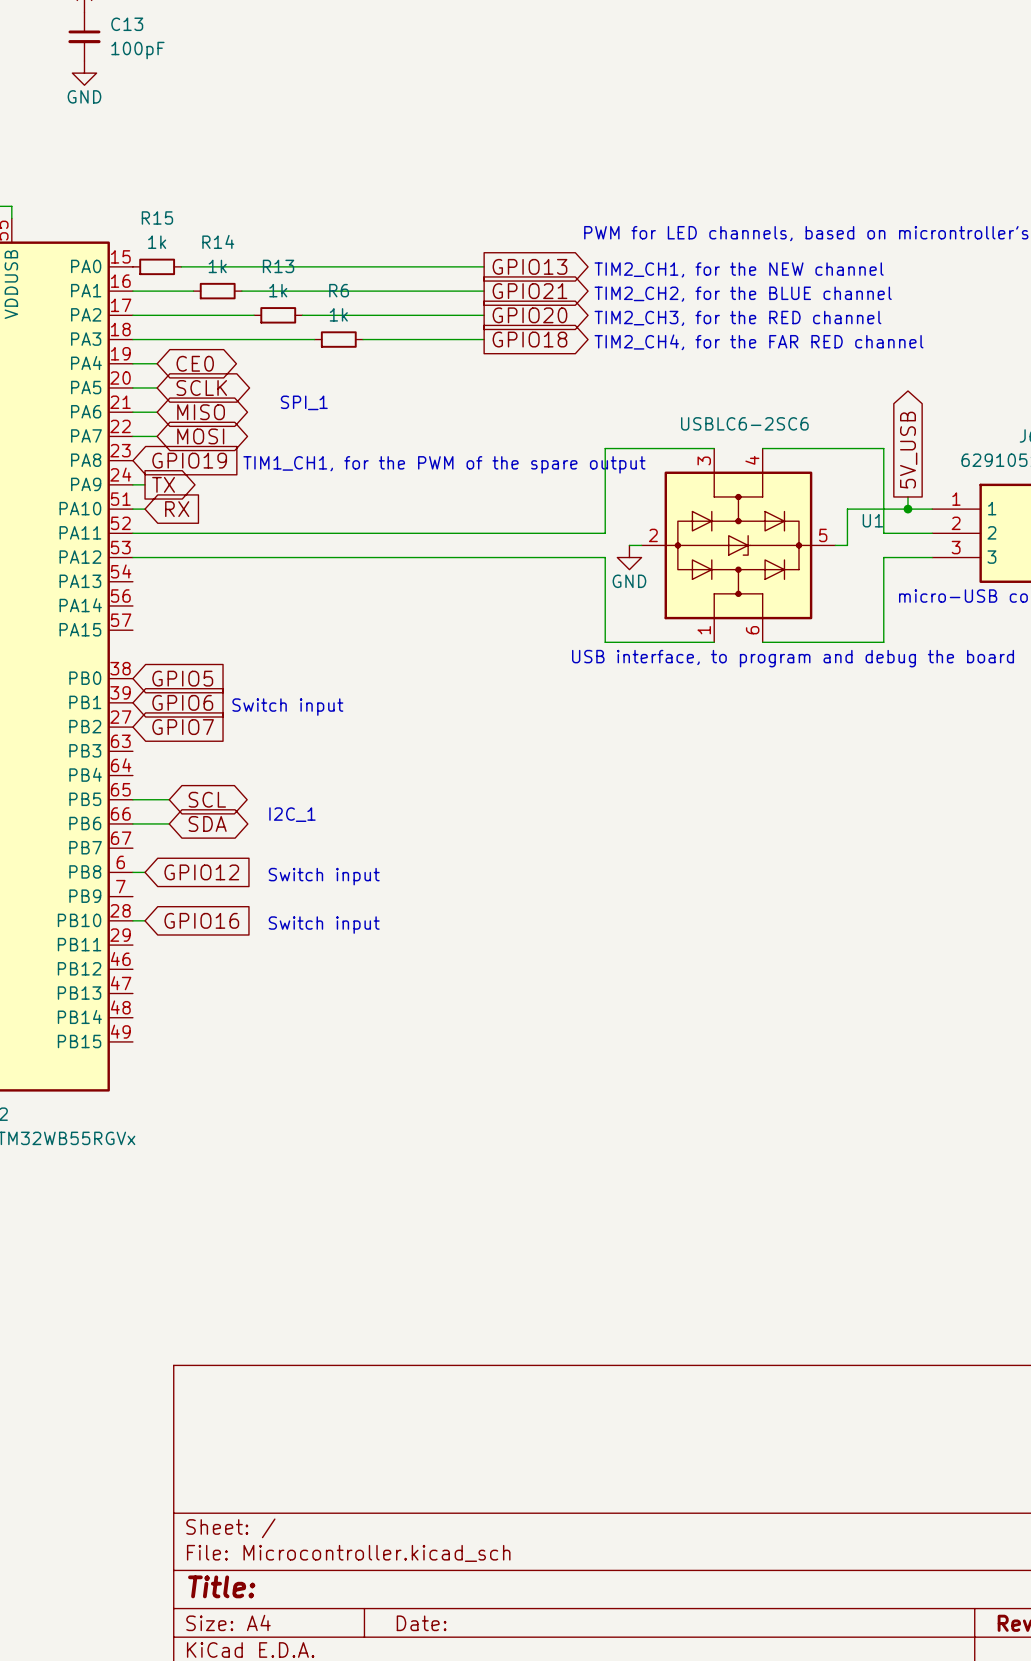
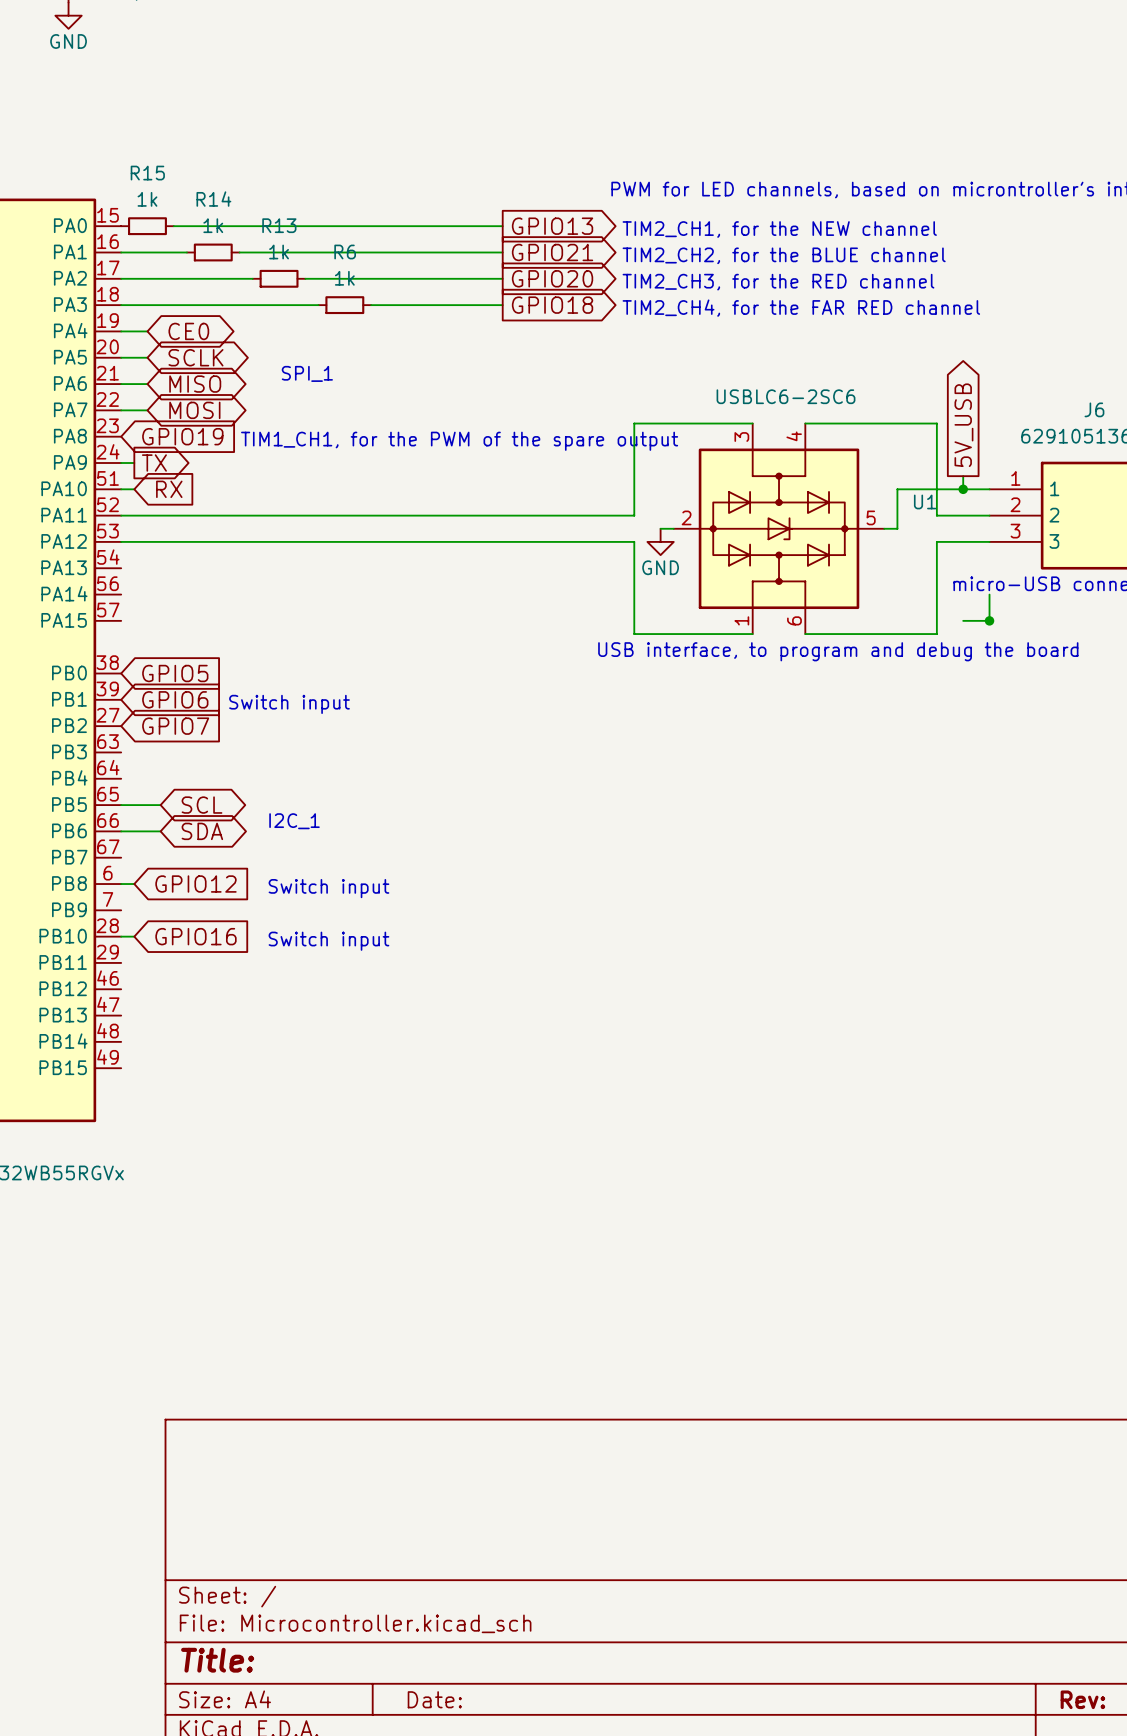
wire: none -> (989, 594) (989, 620) (963, 620)
junction: none -> (989, 620)

